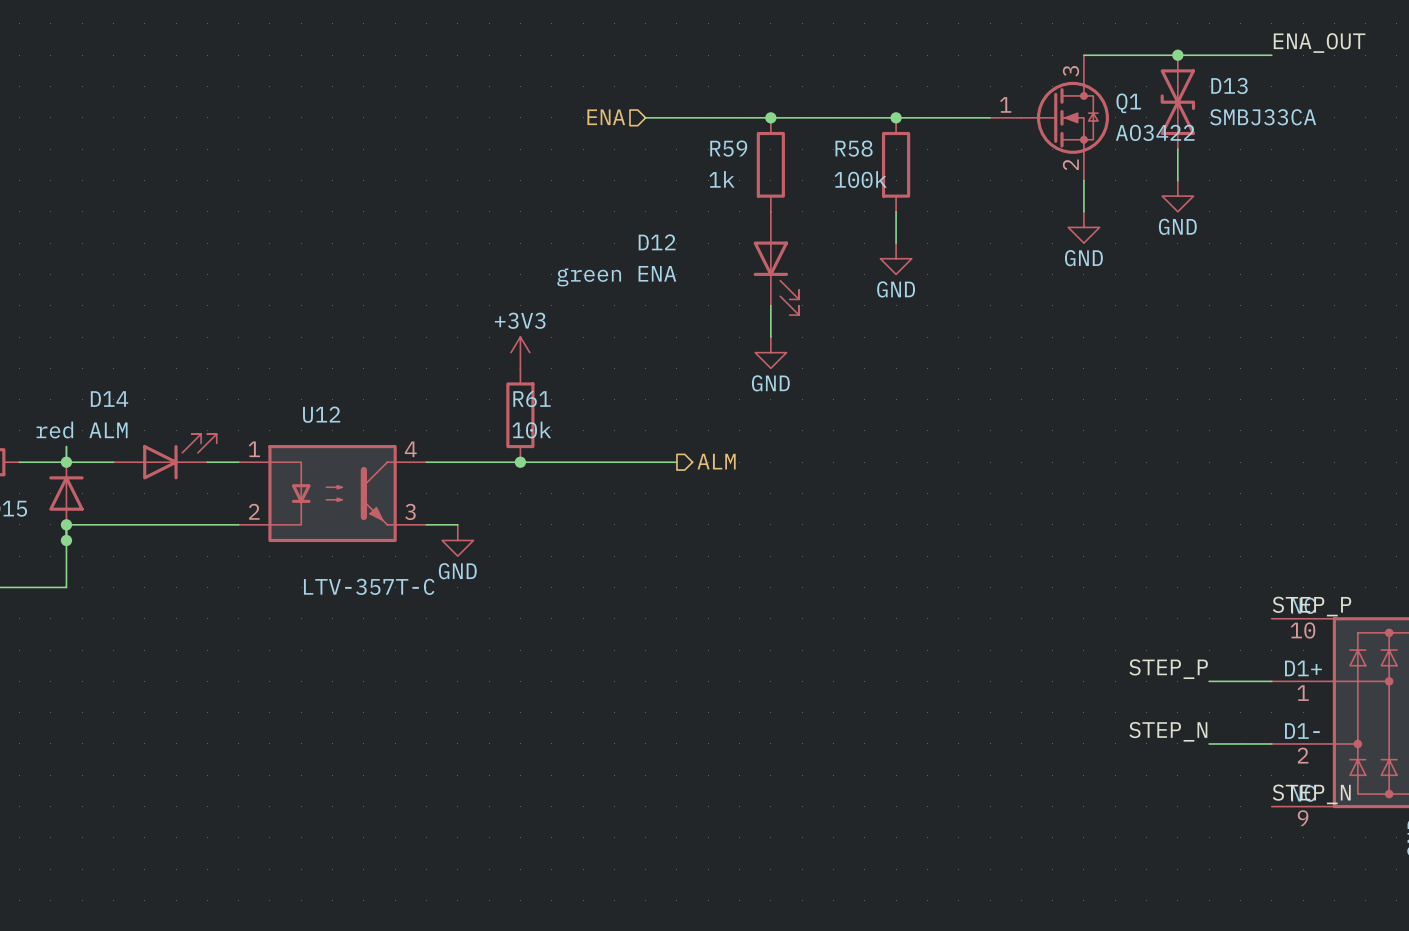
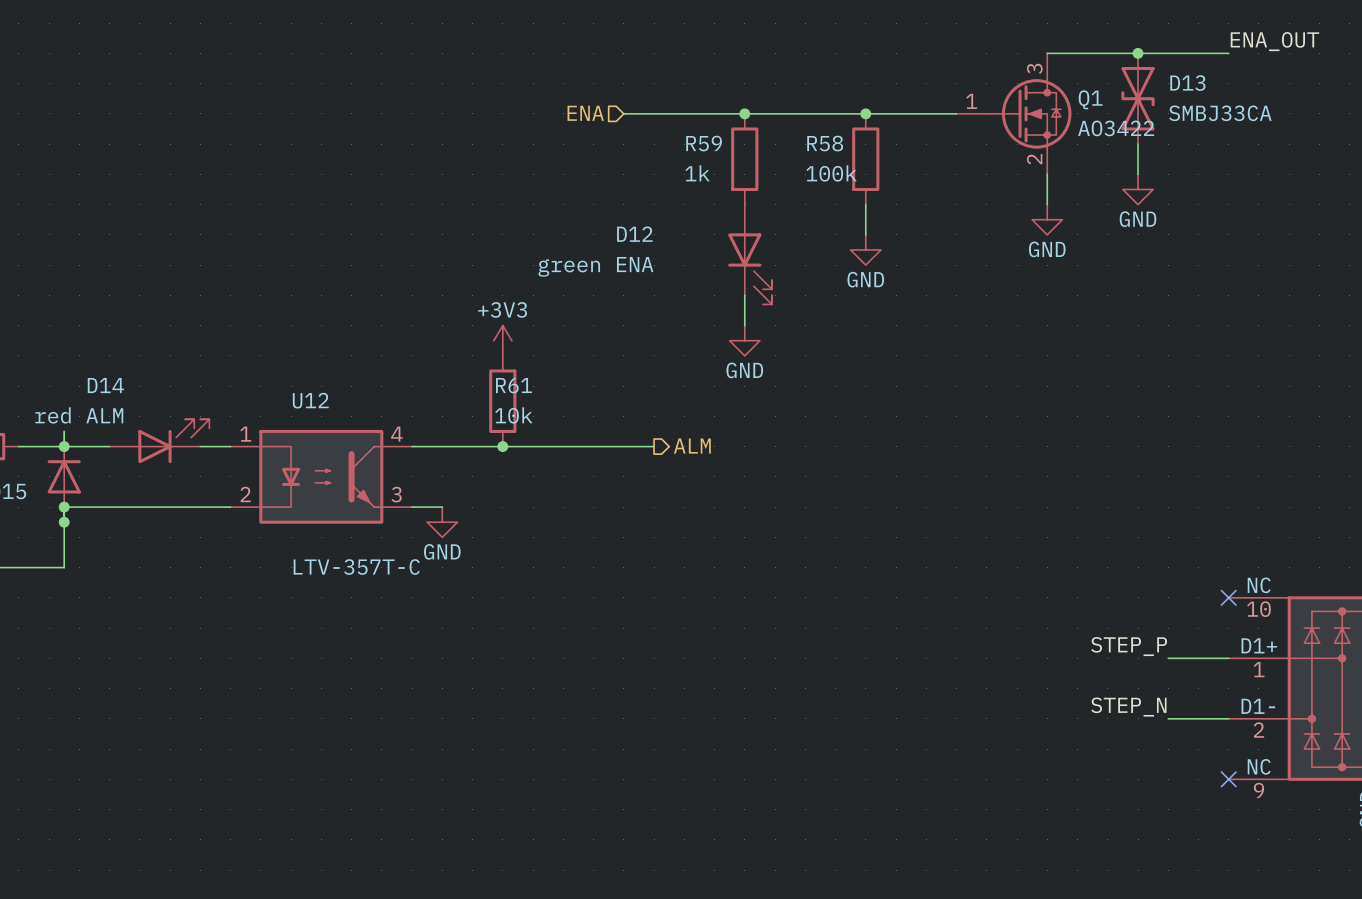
label: STEP_P (1311, 606) -> none
no-connect mark: none -> (1228, 597)
label: STEP_N (1311, 794) -> none
no-connect mark: none -> (1228, 779)

